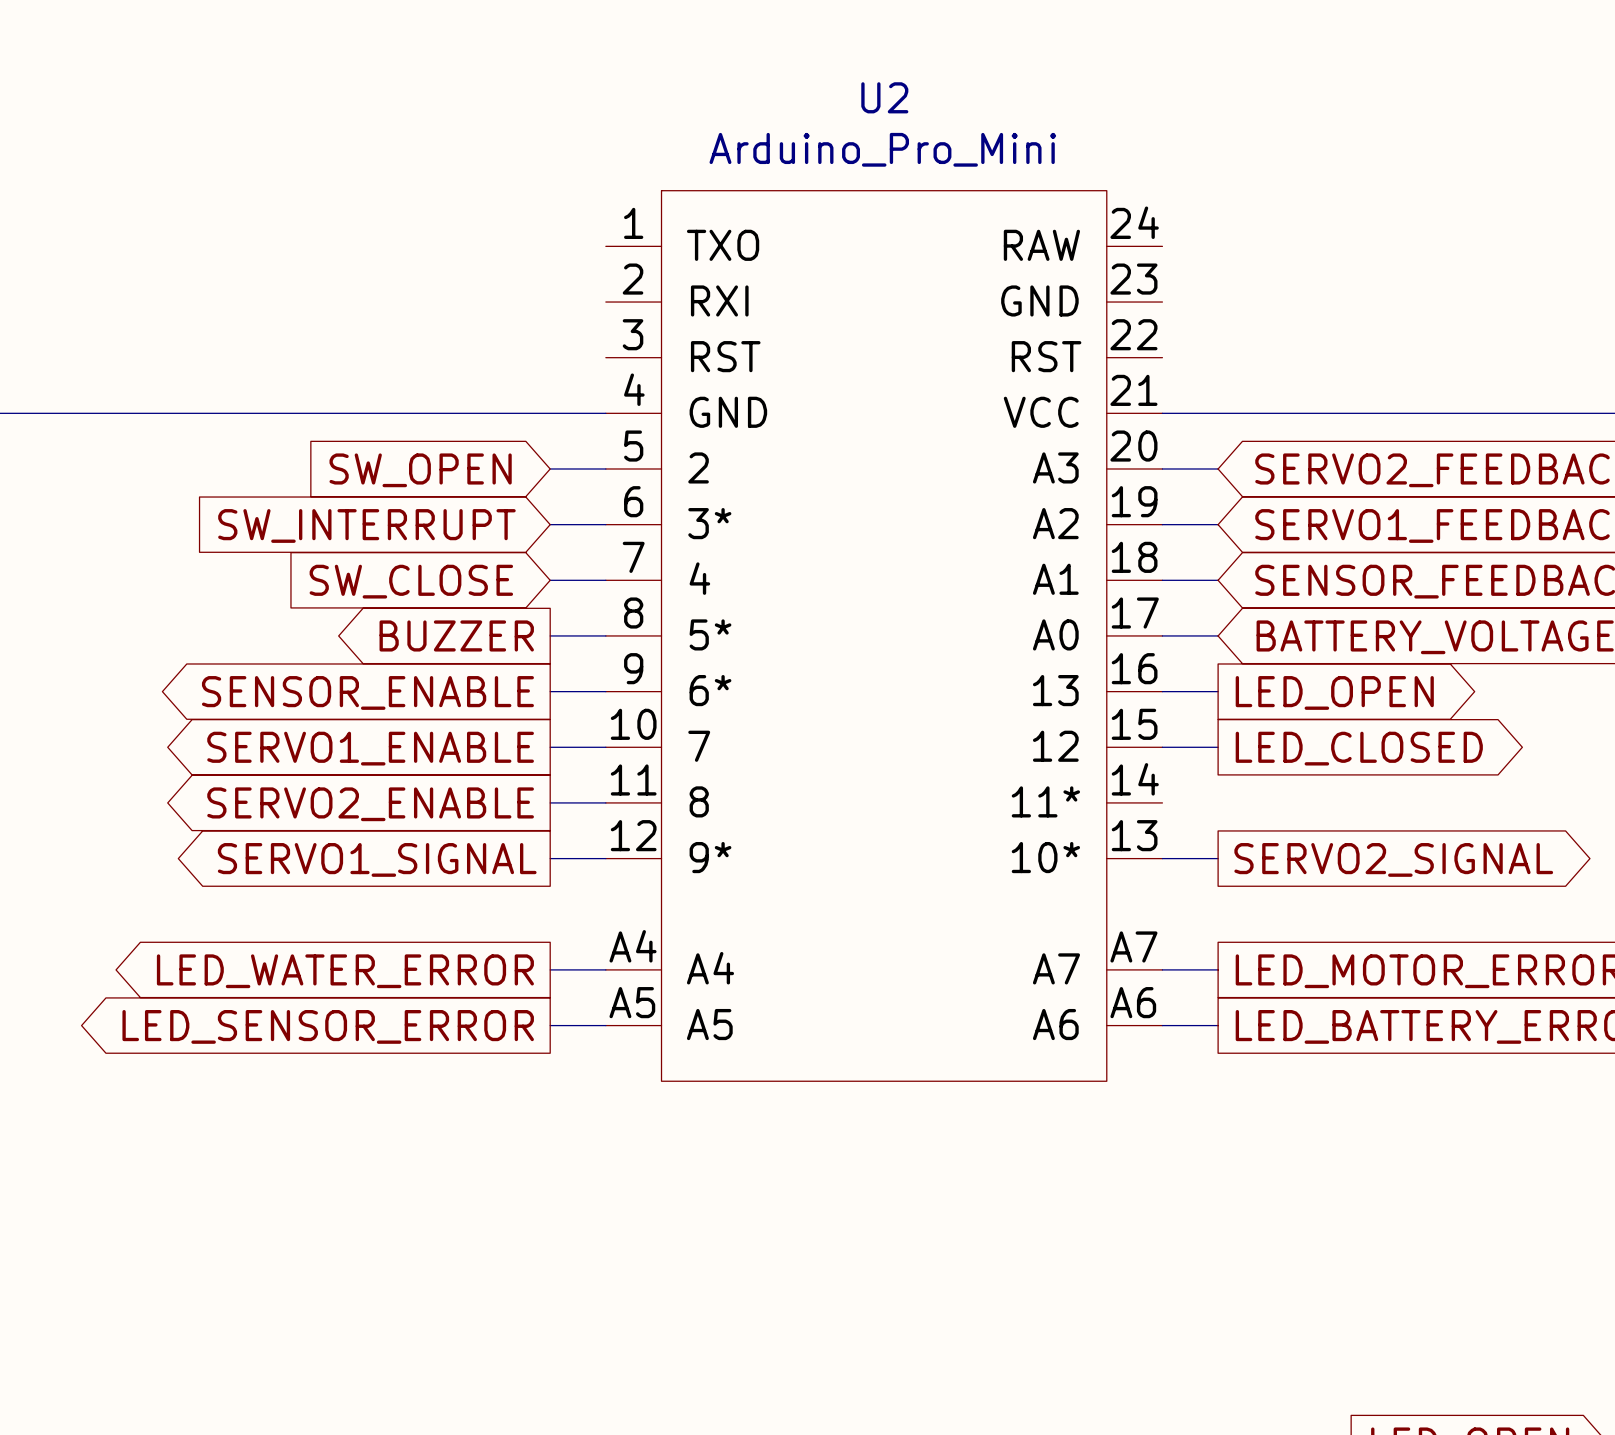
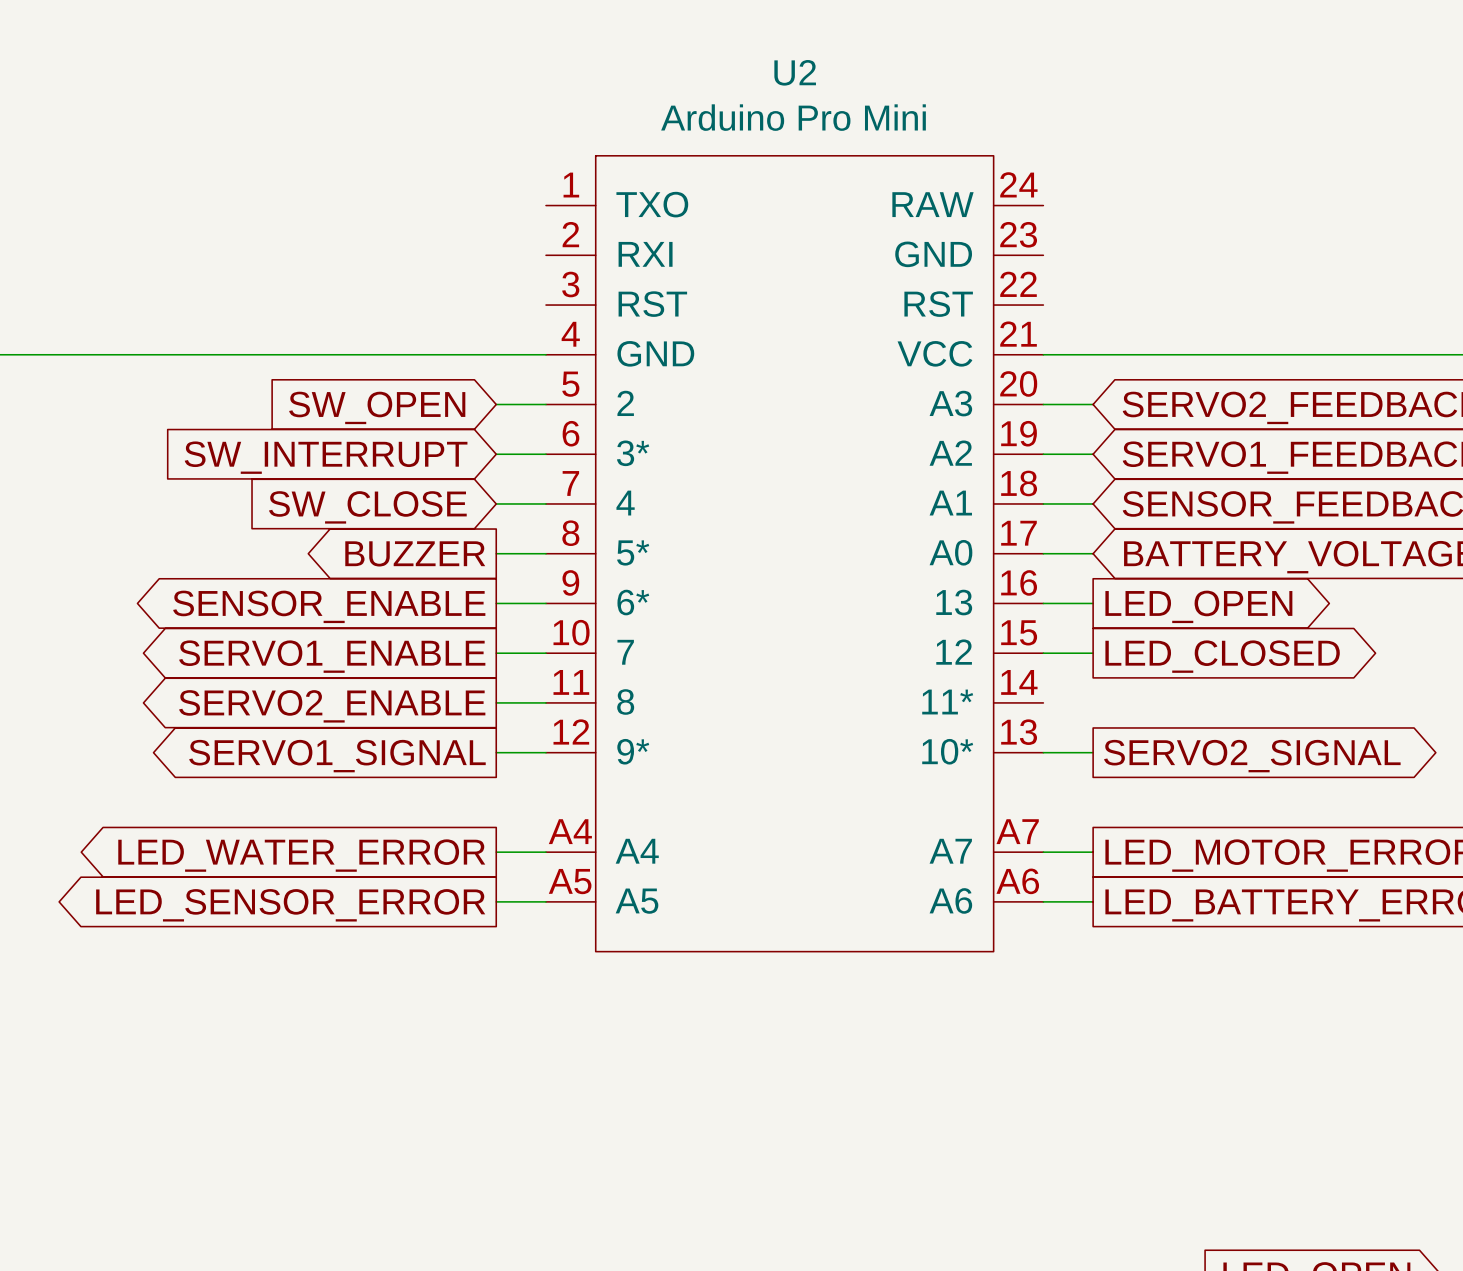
U2 value: Arduino_Pro_Mini (882, 149) -> Arduino Pro Mini (793, 117)

